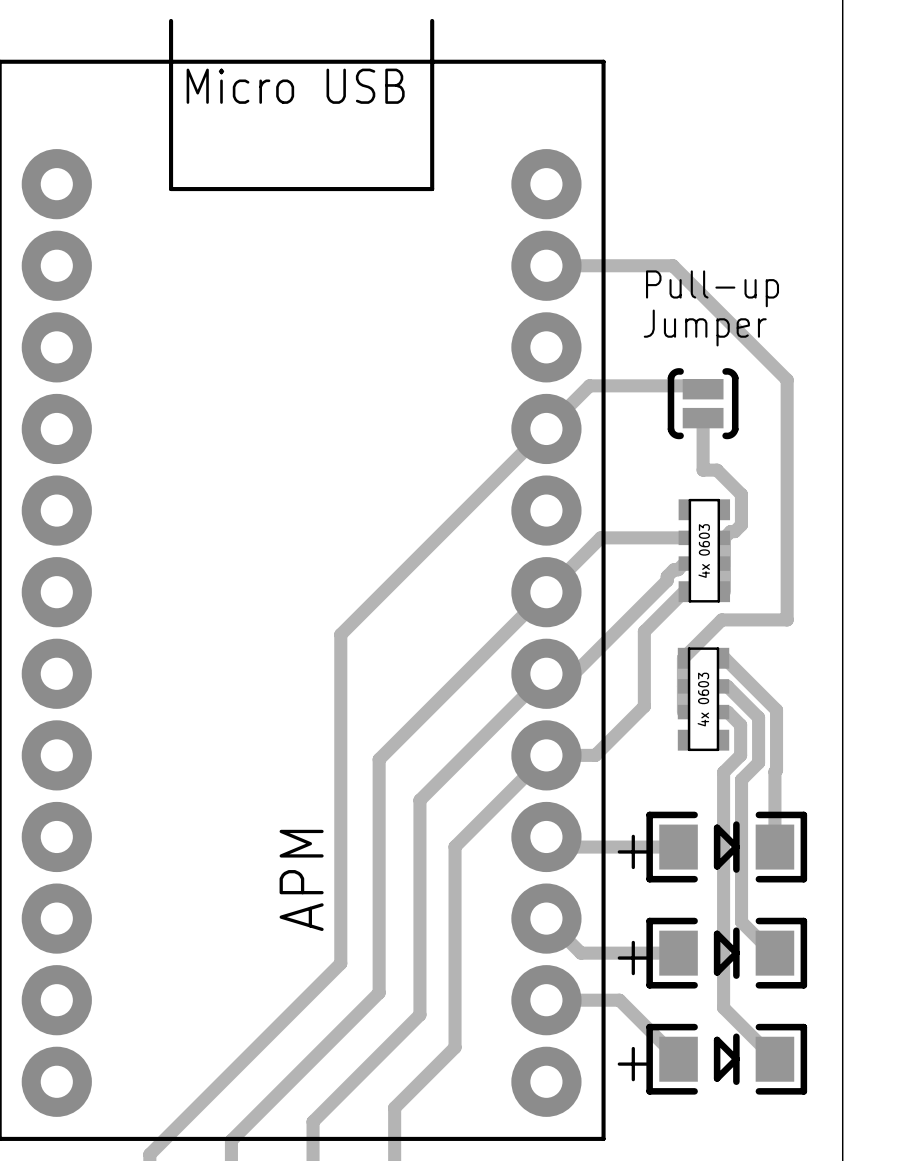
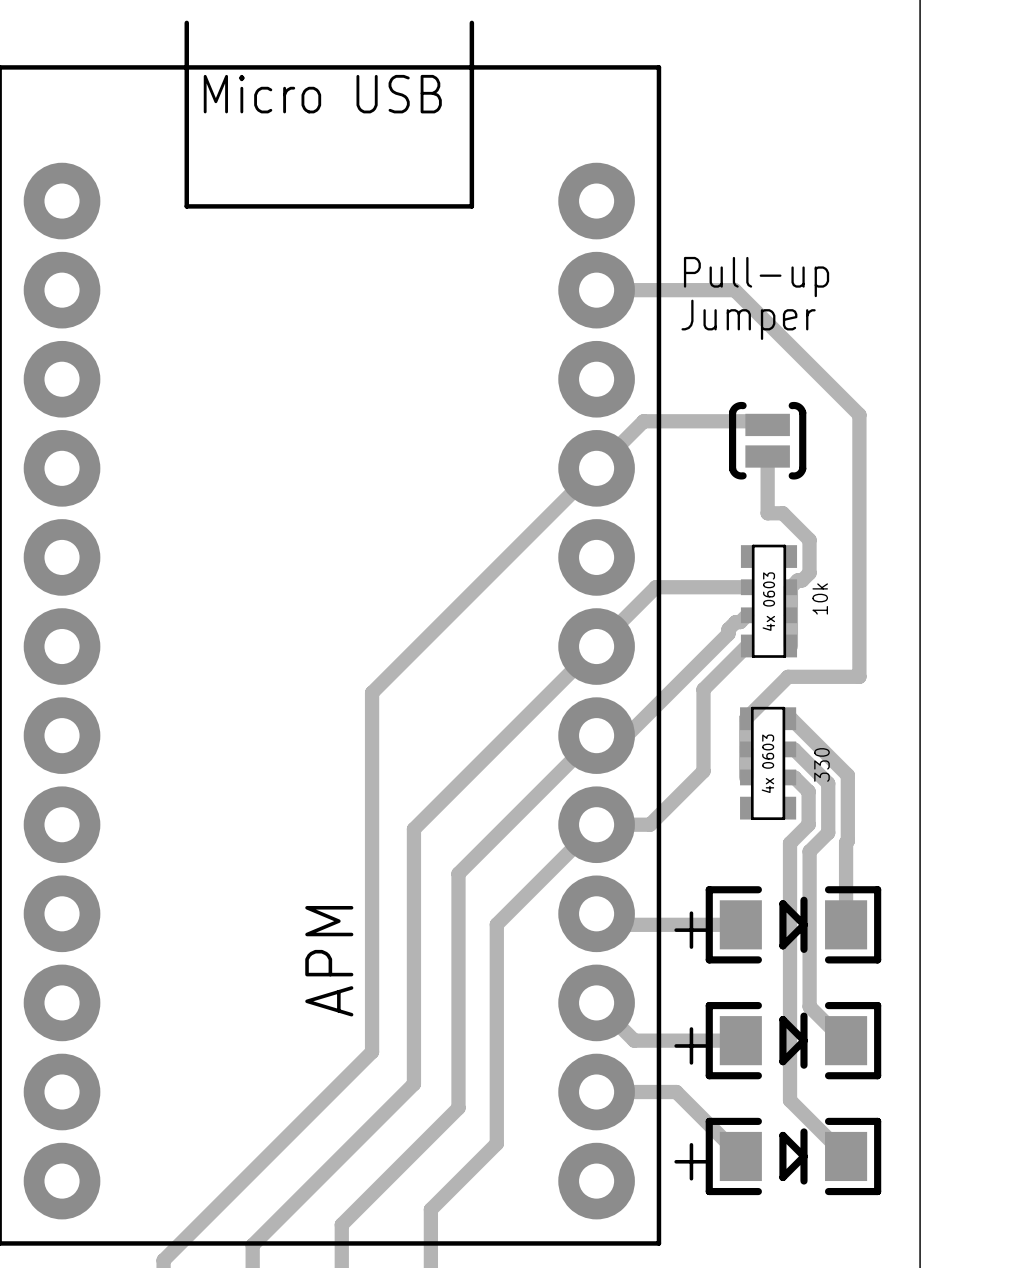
text position: Pull-up (712, 288) -> Pull-up (756, 277)
text position: Jumper (705, 328) -> Jumper (748, 319)
text: none -> 10k (820, 598)
text: none -> 330 (822, 764)

